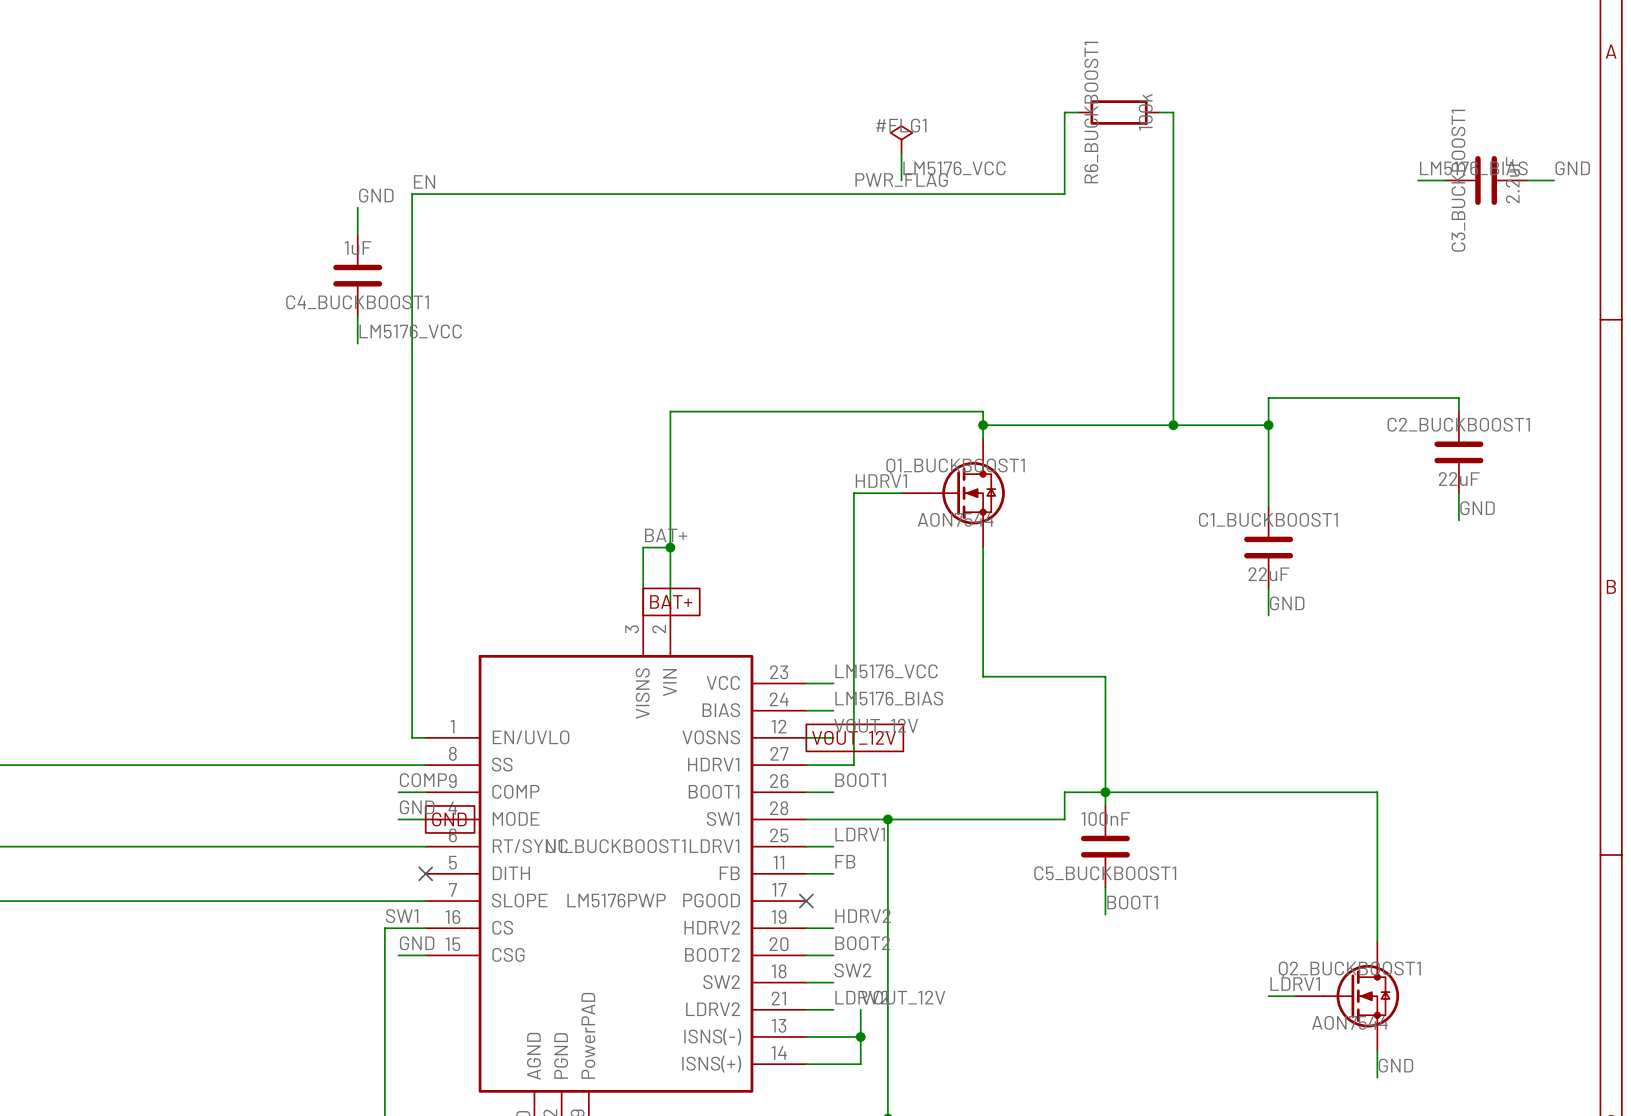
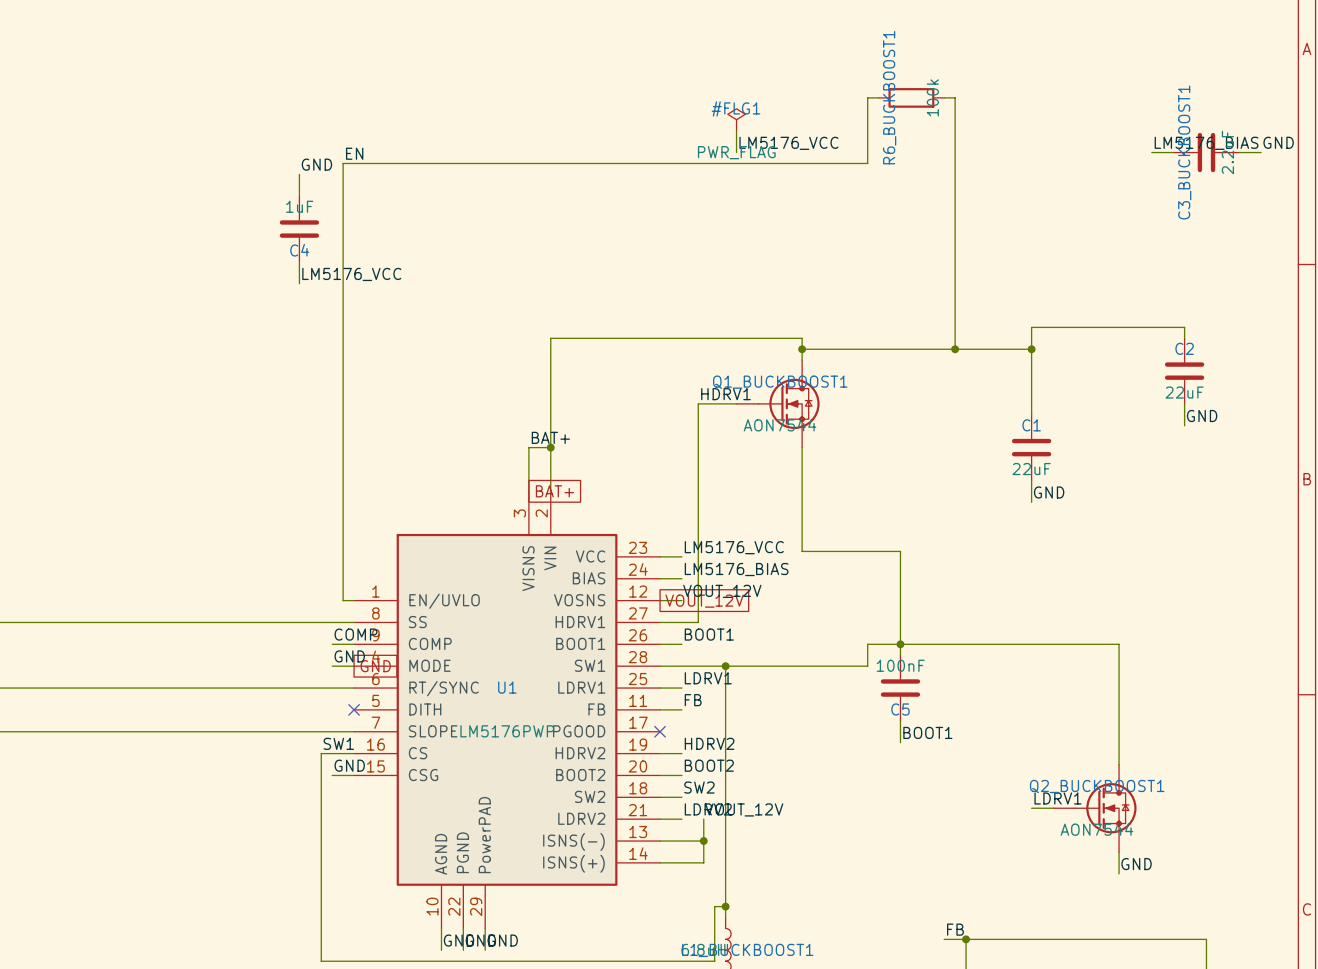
C4_BUCKBOOST1 name: C4_BUCKBOOST1 (357, 302) -> C4 (299, 250)
C2_BUCKBOOST1 name: C2_BUCKBOOST1 (1458, 424) -> C2 (1184, 348)
C1_BUCKBOOST1 name: C1_BUCKBOOST1 (1268, 519) -> C1 (1031, 425)
U1_BUCKBOOST1 name: U1_BUCKBOOST1 (615, 846) -> U1 (507, 687)
C5_BUCKBOOST1 name: C5_BUCKBOOST1 (1105, 873) -> C5 (900, 709)

